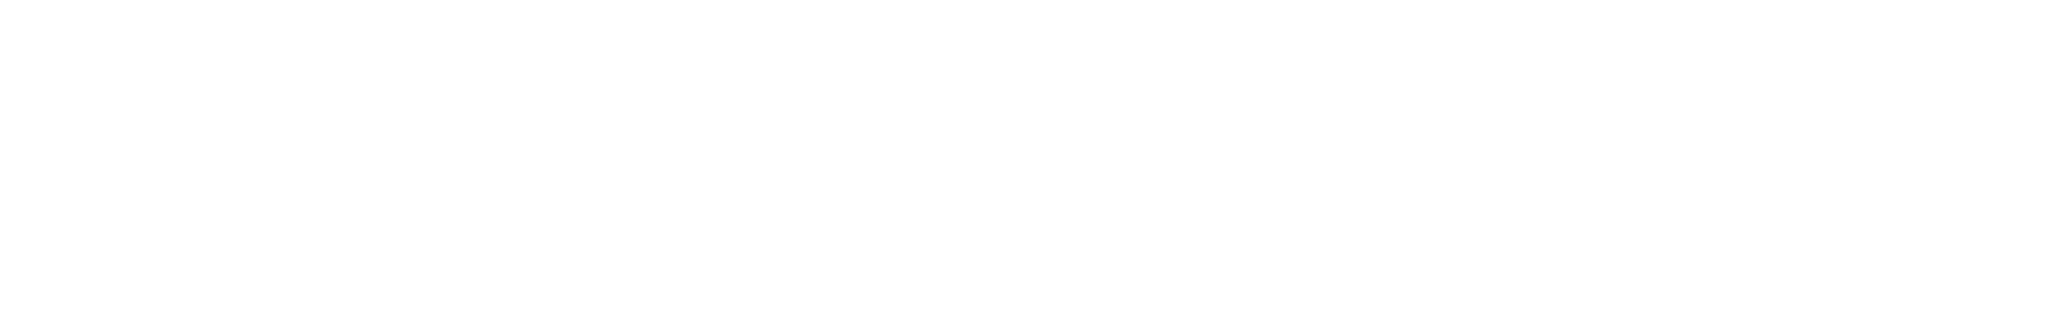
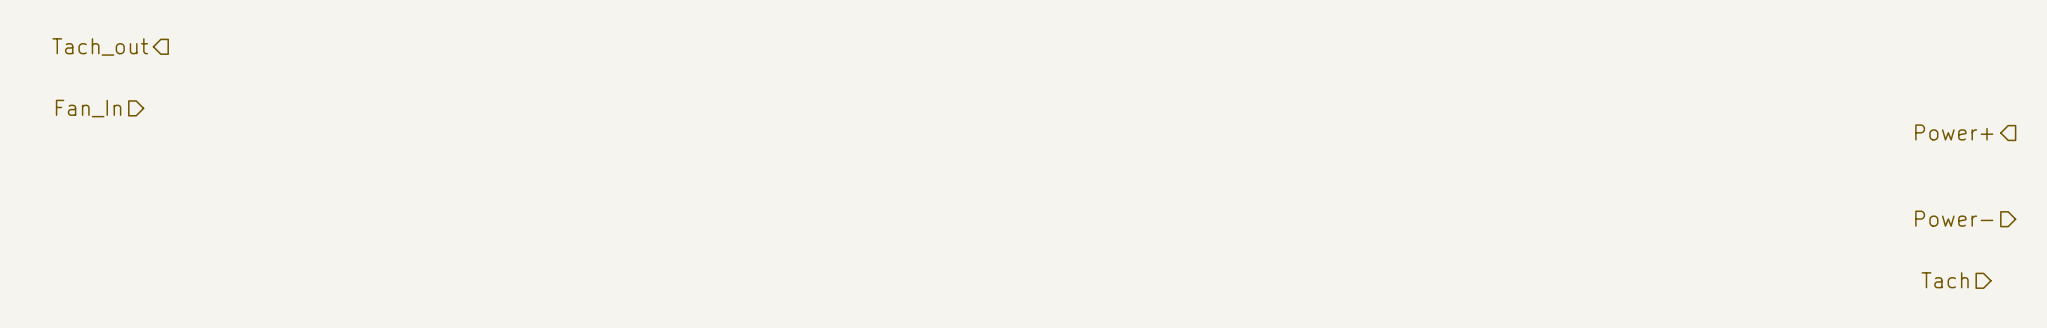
hierarchical label: none -> Tach_out (100, 46)
hierarchical label: none -> Fan_In (88, 108)
hierarchical label: none -> Power+ (1954, 132)
hierarchical label: none -> Power- (1954, 218)
hierarchical label: none -> Tach (1945, 280)

